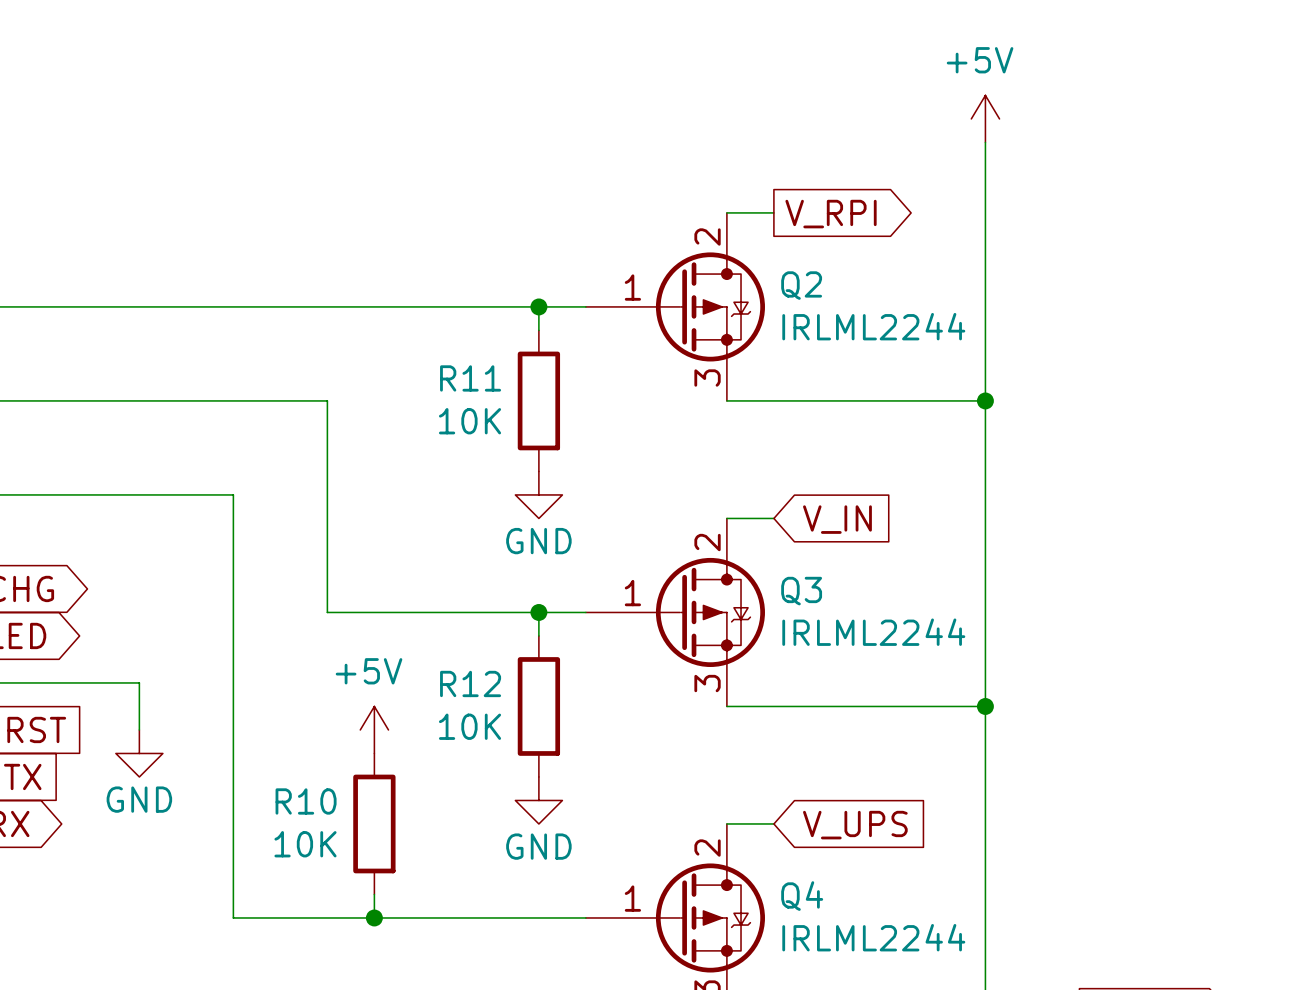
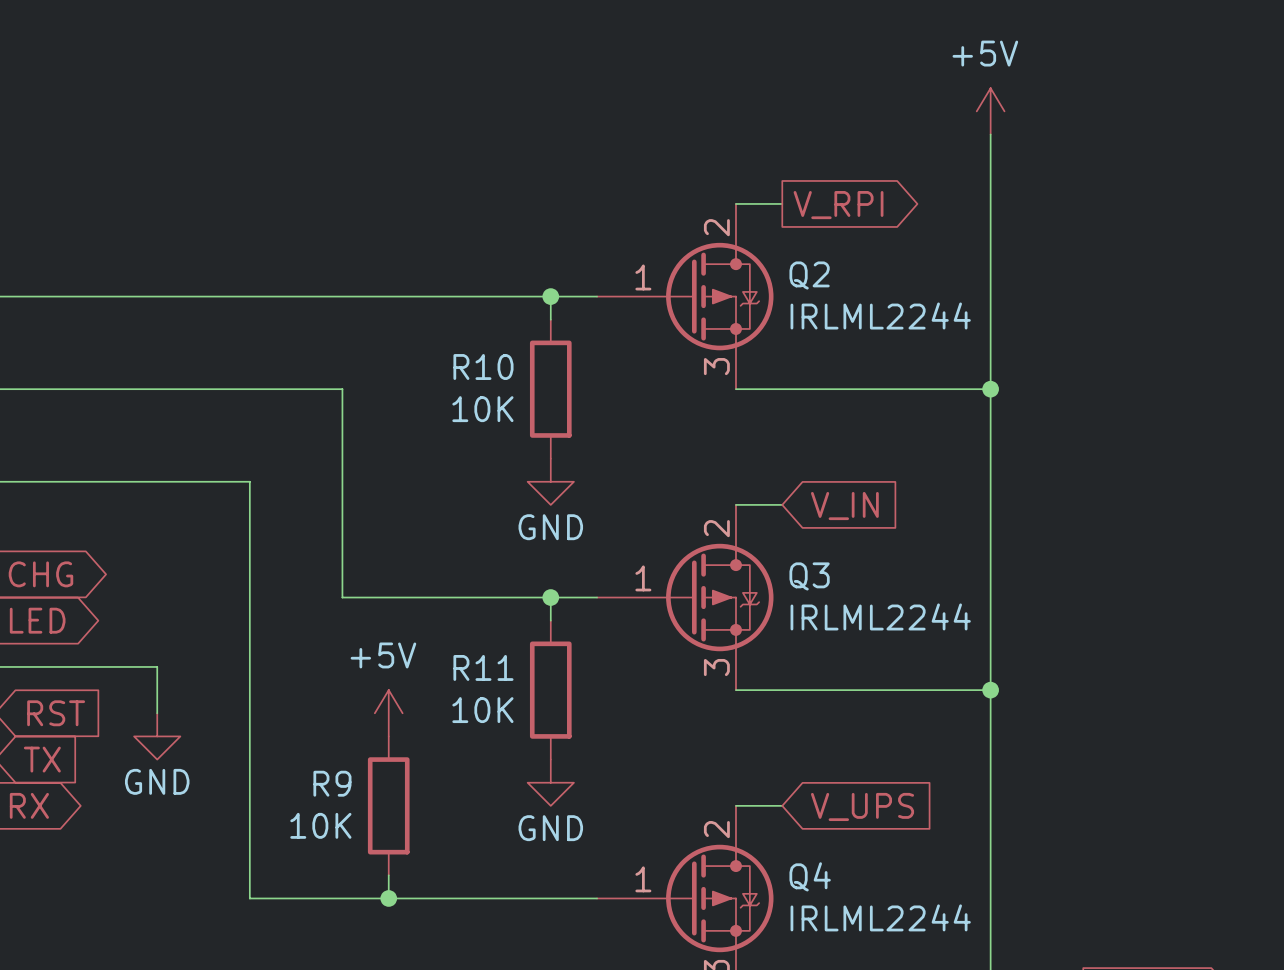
R11 name: R11 (470, 378) -> R10 (483, 367)
R12 name: R12 (470, 683) -> R11 (483, 667)
R10 name: R10 (306, 801) -> R9 (332, 783)

